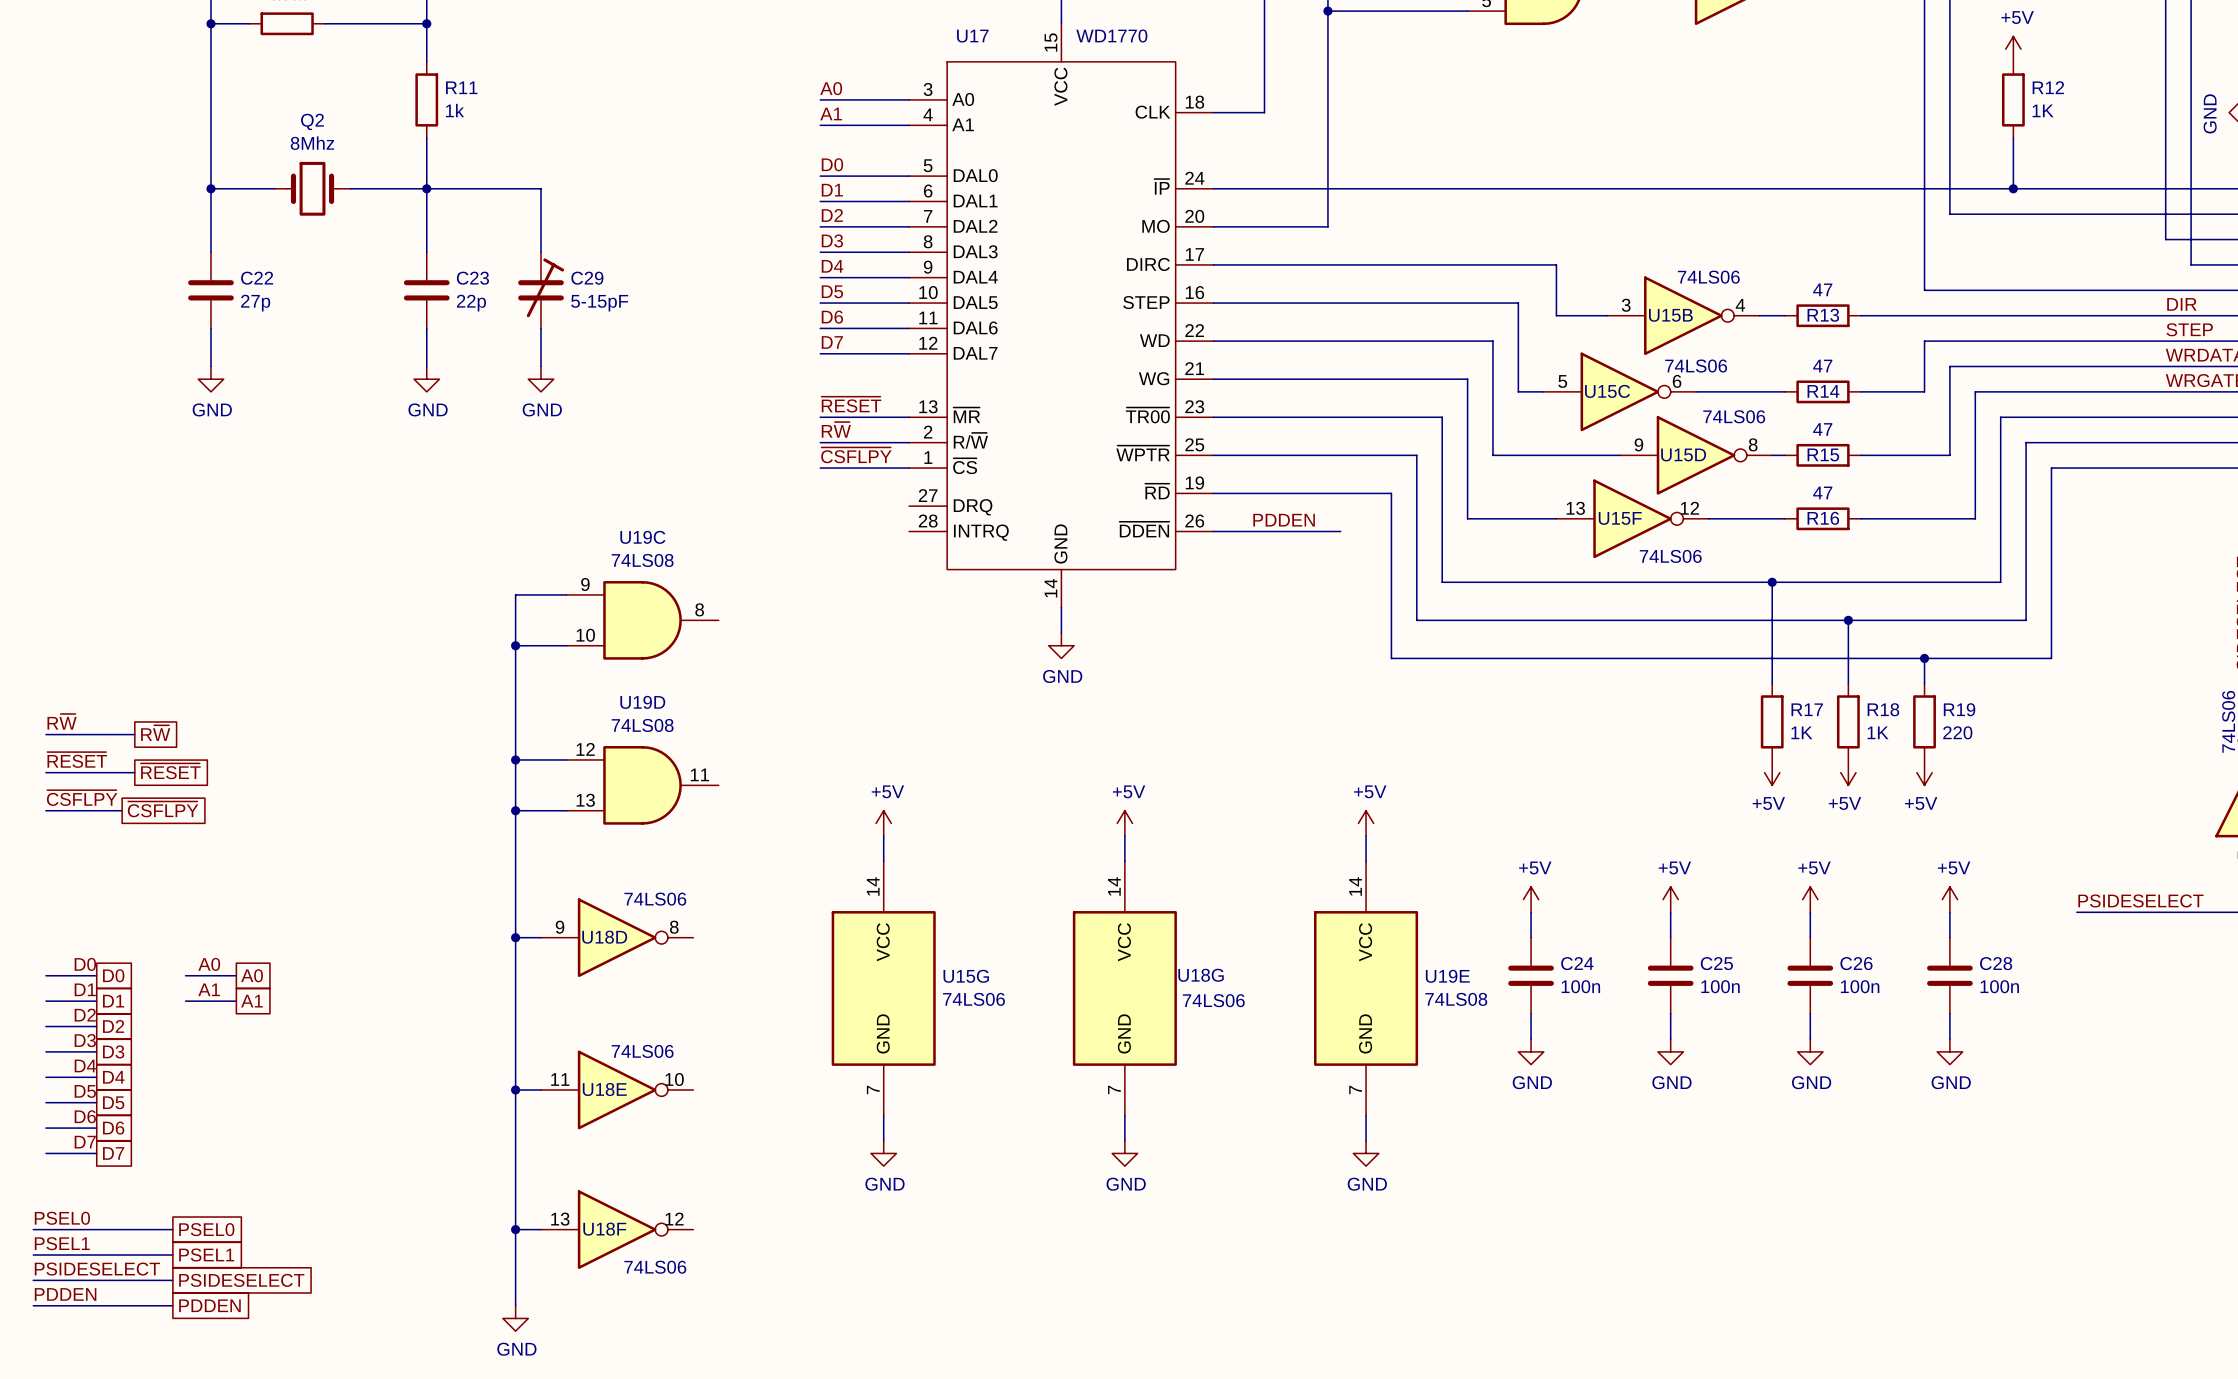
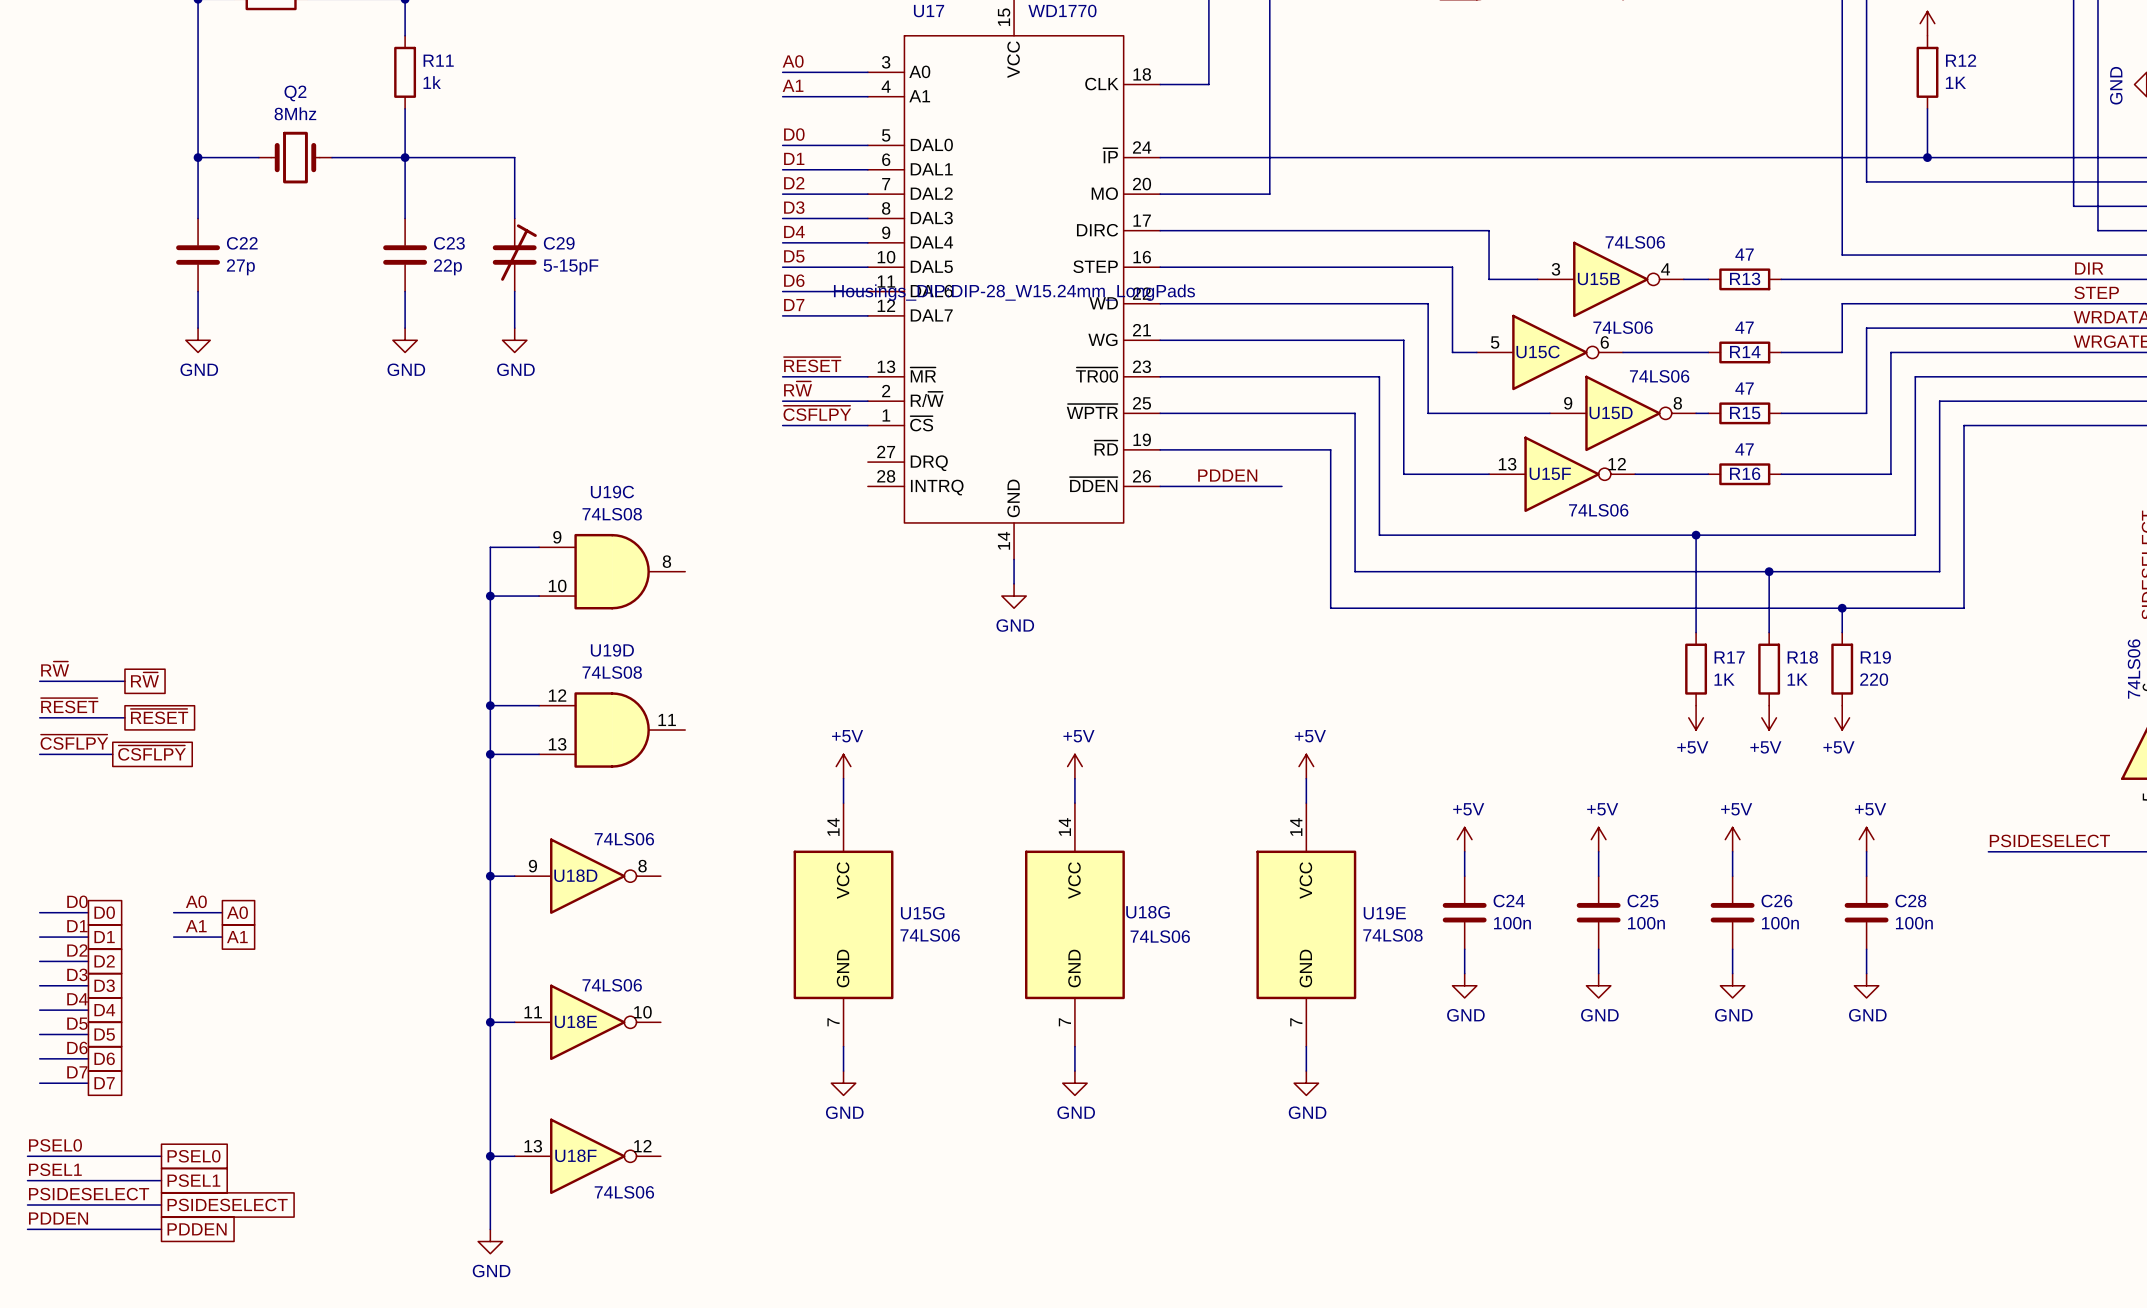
U17 text: none -> Housings_DIP:DIP-28_W15.24mm_LongPads (1014, 292)

